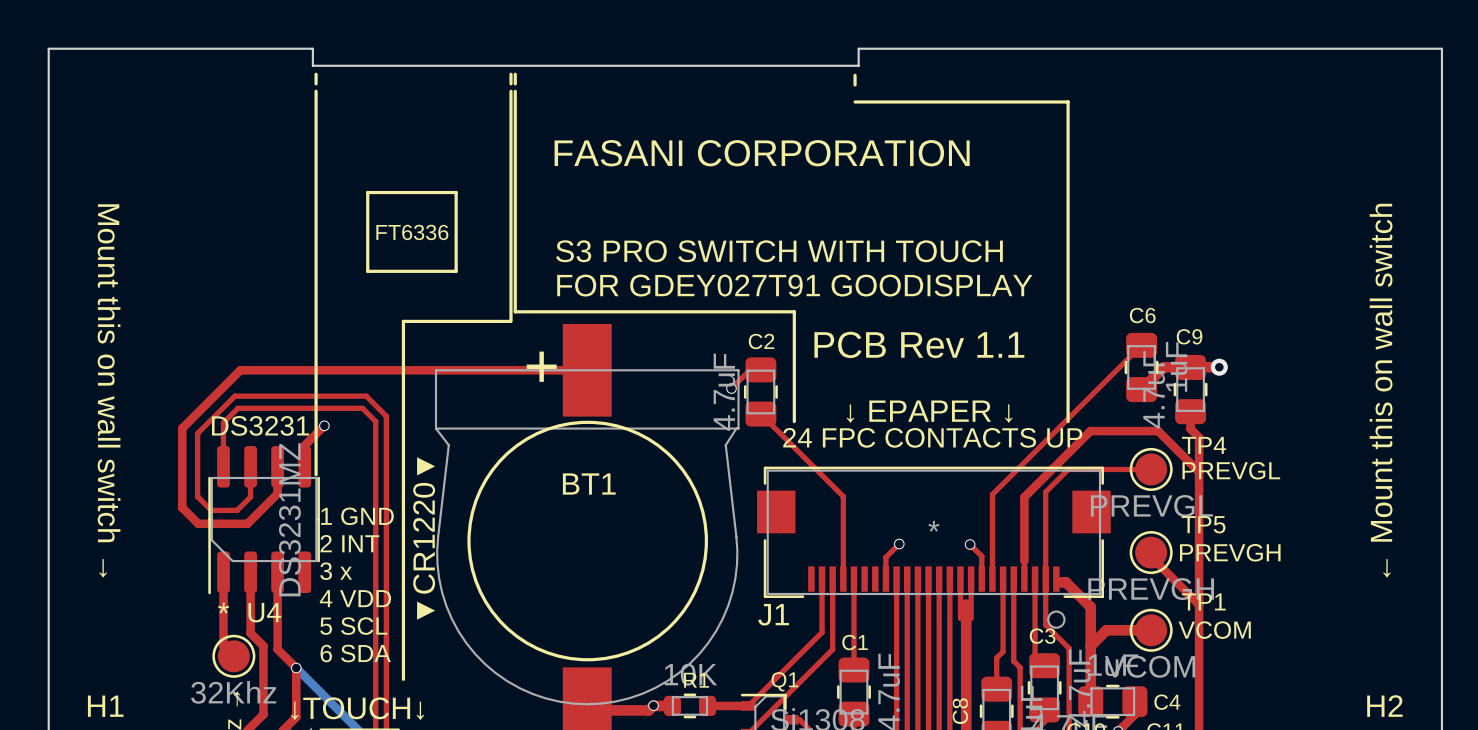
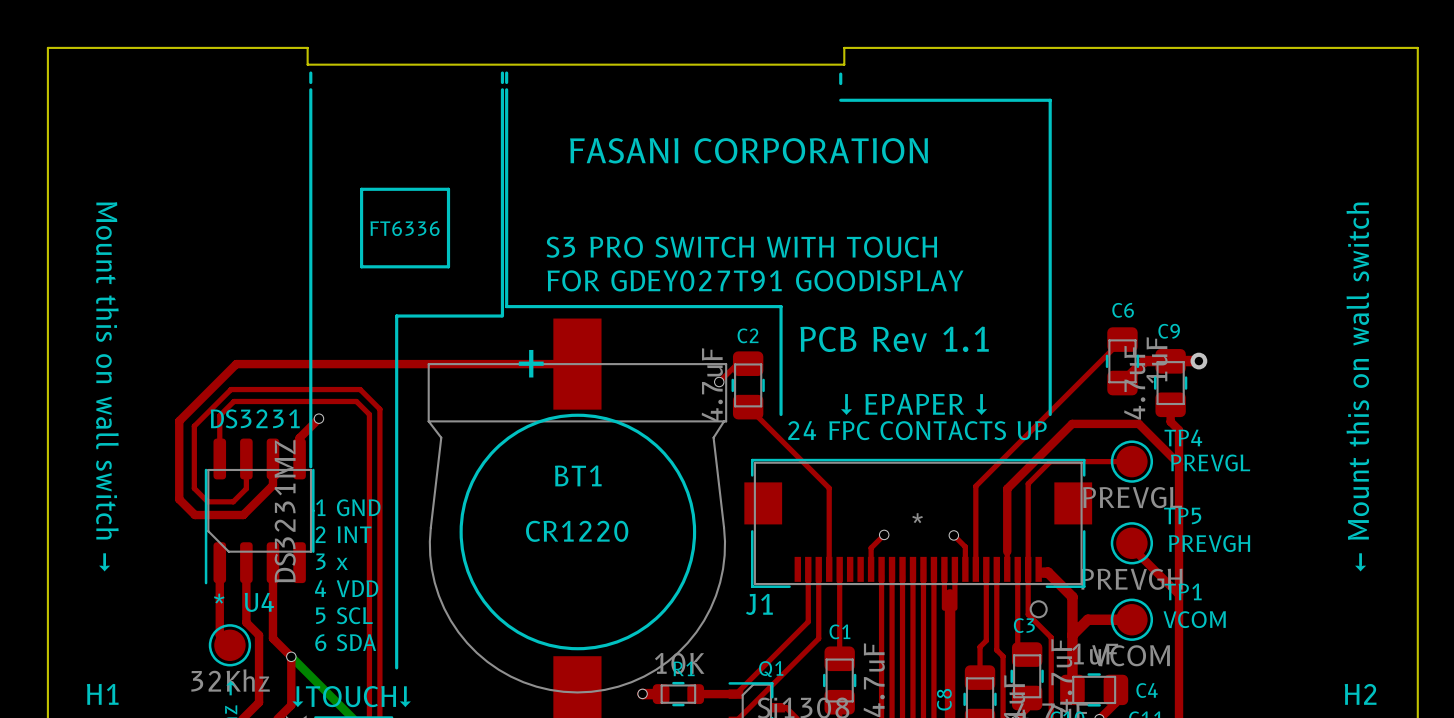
text: ▼CR1220▼ (424, 538) -> none
text: none -> CR1220 (577, 531)
top track: (653, 705) (648, 710) (587, 710) -> none

